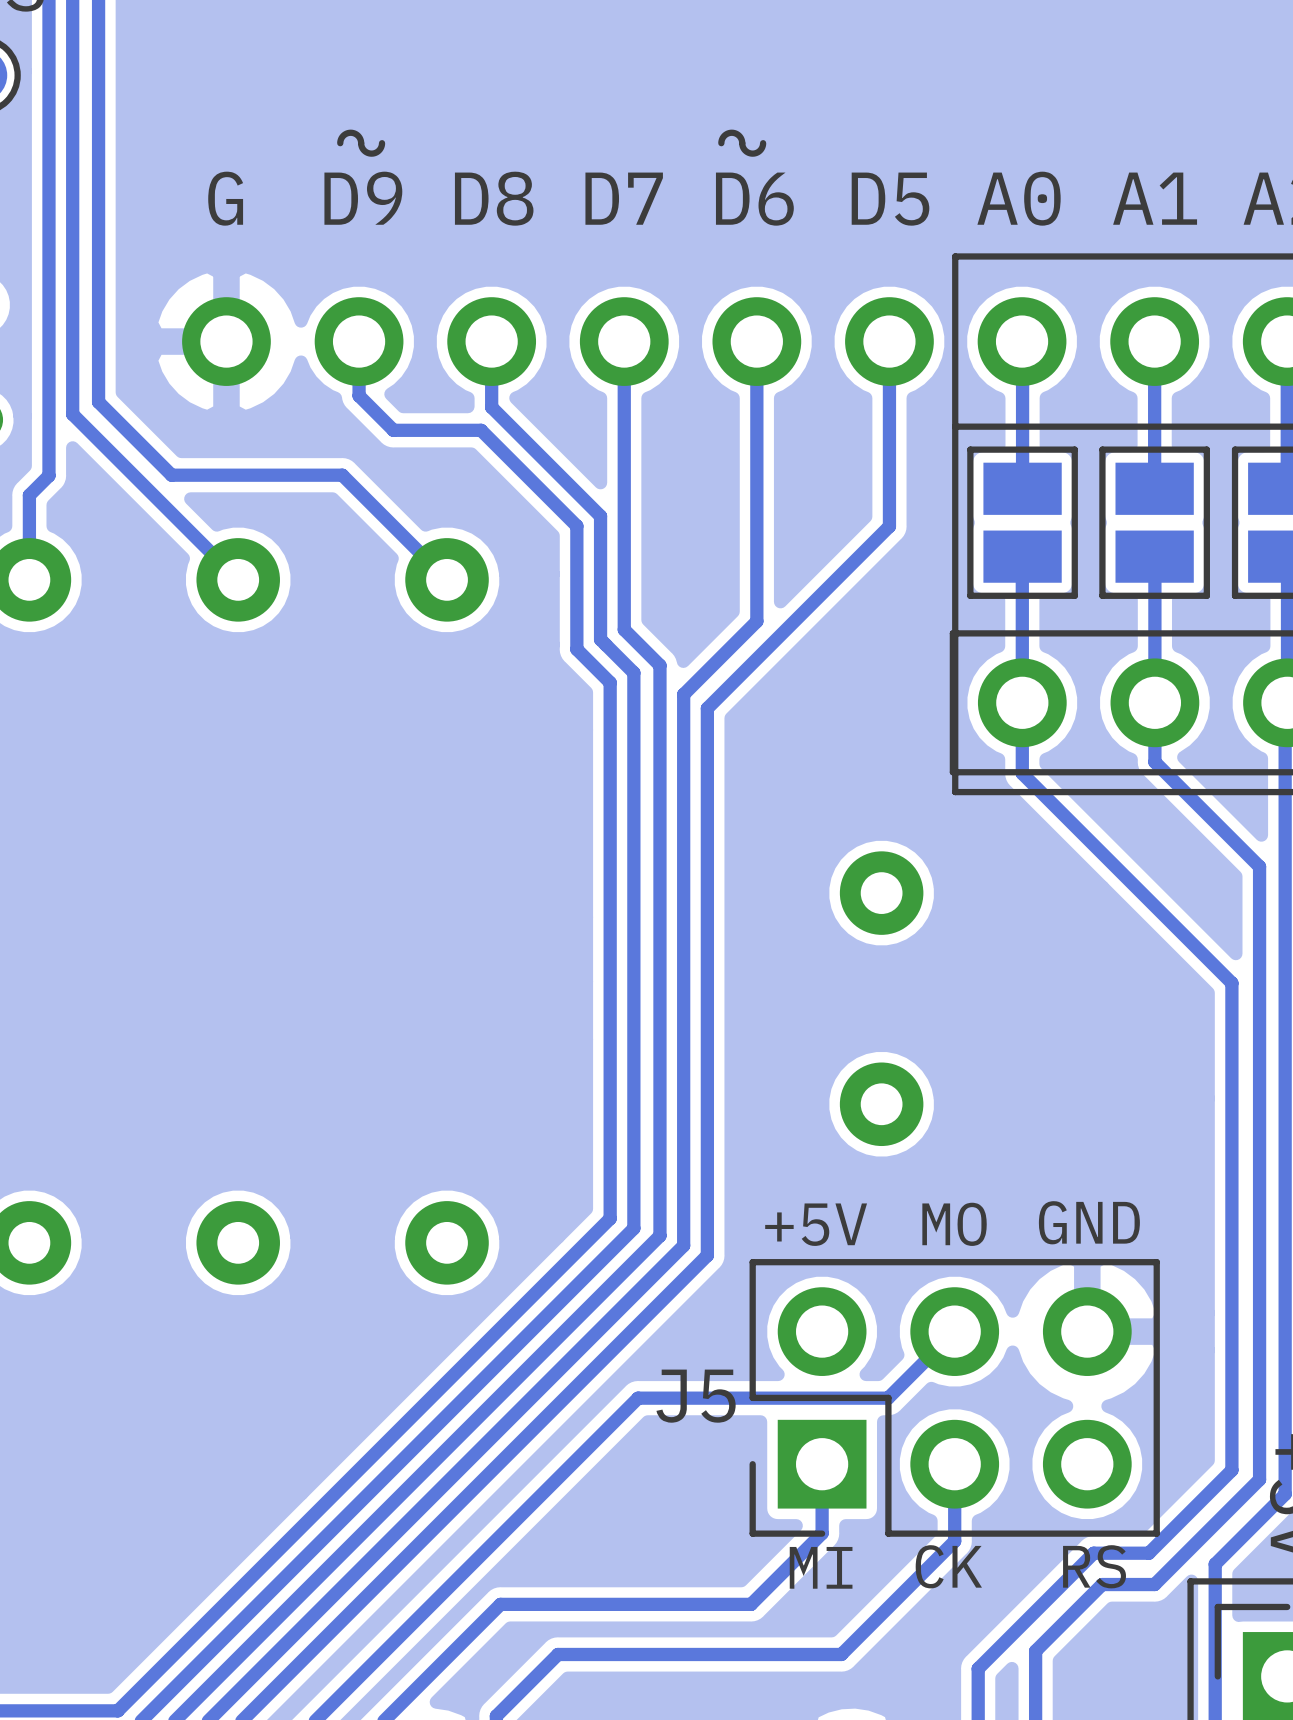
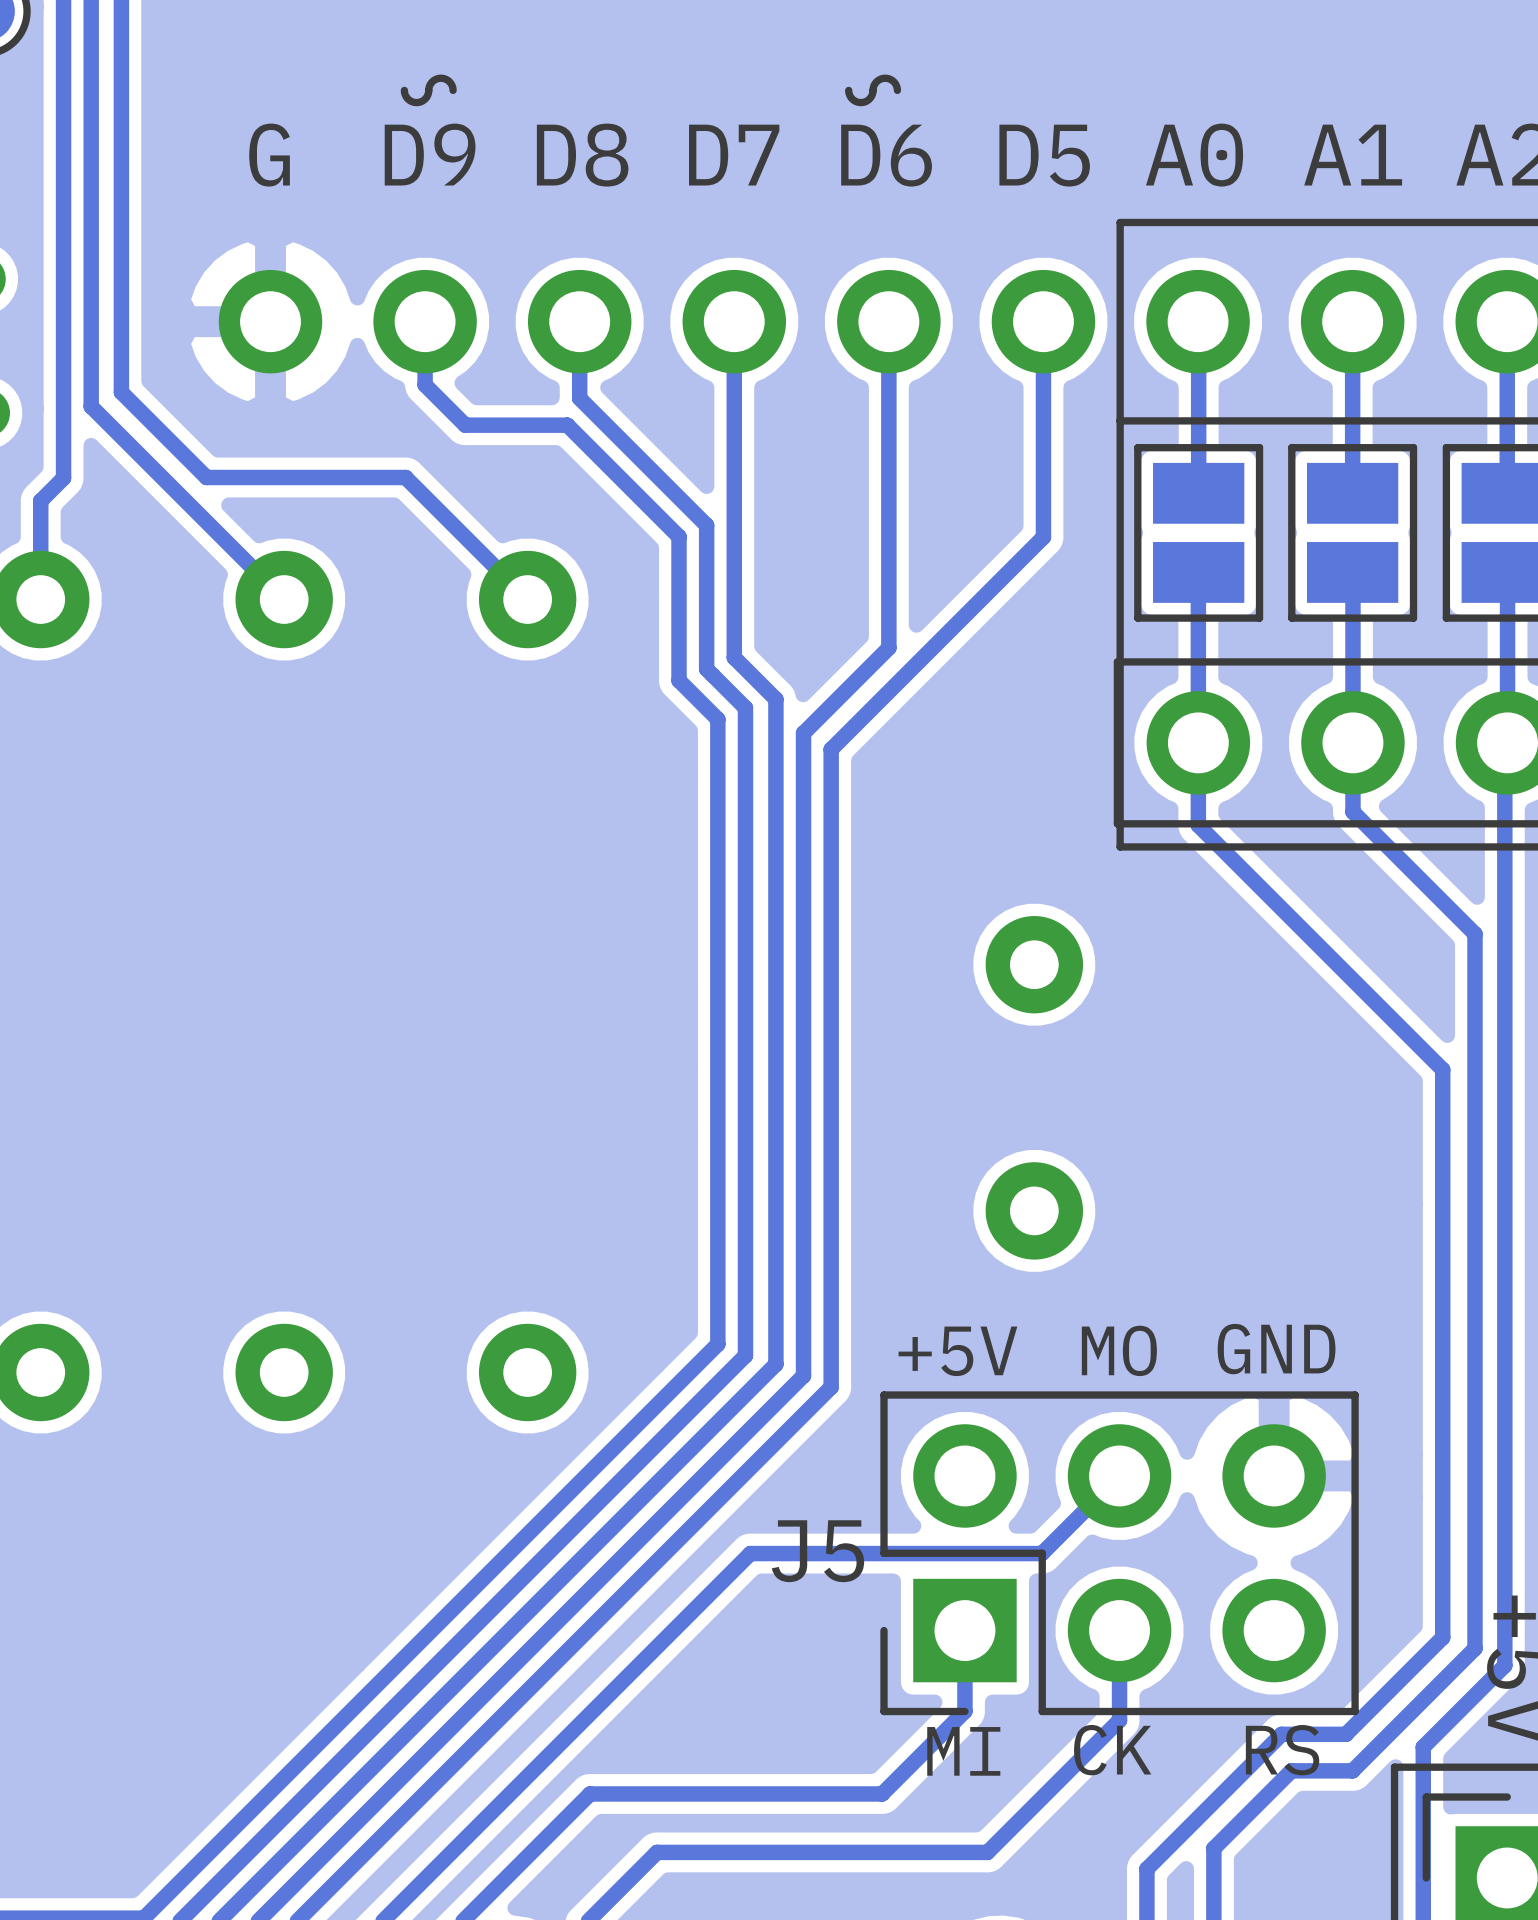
line: (382, 143) (378, 150) (371, 153) (364, 150) (359, 137) (353, 133) (344, 134) (340, 143) -> (453, 90) (449, 81) (440, 78) (432, 81) (427, 96) (419, 102) (409, 100) (404, 90)
line: (763, 143) (760, 150) (752, 153) (745, 150) (740, 137) (734, 133) (725, 134) (721, 143) -> (897, 90) (893, 81) (885, 78) (876, 81) (871, 96) (864, 102) (853, 100) (848, 90)

